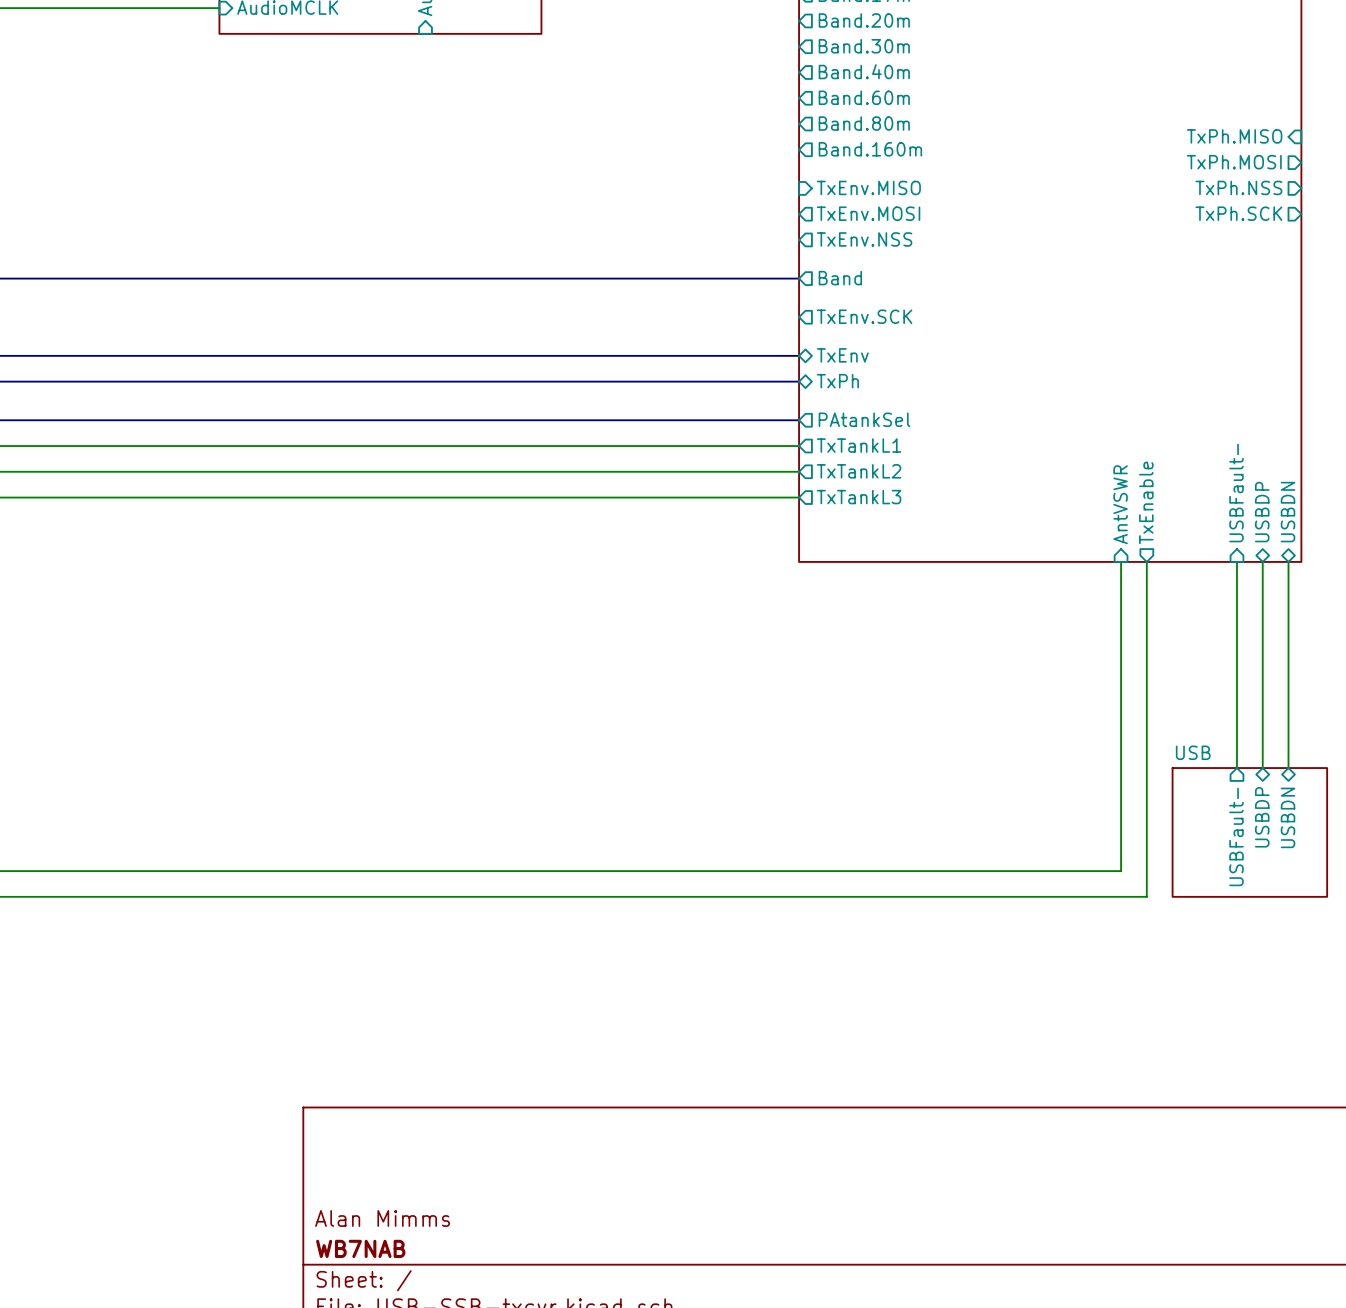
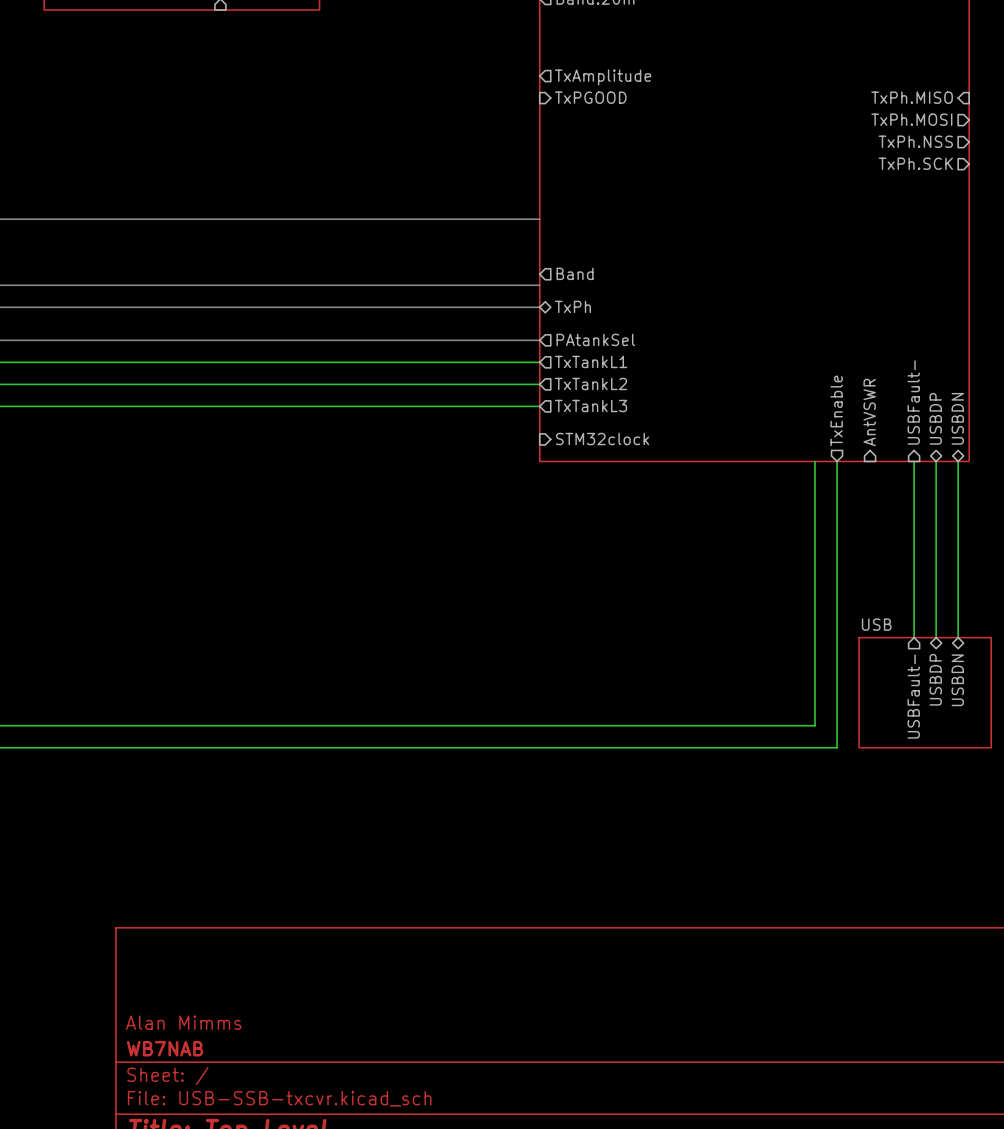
sheet pin: Band.30m (864, 46) -> none
sheet pin: Band.40m (864, 71) -> none
sheet pin: Band.60m (864, 97) -> none
sheet pin: none -> TxAmplitude (603, 77)
sheet pin: Band.80m (864, 123) -> none
sheet pin: none -> TxPGOOD (590, 97)
sheet pin: Band.160m (870, 149) -> none
sheet pin: TxEnv.MISO (868, 187) -> none
sheet pin: TxEnv.MOSI (868, 213) -> none
sheet pin: TxEnv.NSS (864, 239) -> none
sheet pin position: Band (840, 278) -> Band (575, 273)
sheet pin: TxEnv.SCK (864, 316) -> none
sheet pin: TxEnv (842, 355) -> none
sheet pin position: AntVSWR (1120, 504) -> AntVSWR (869, 412)
sheet pin: none -> STM32clock (602, 439)

